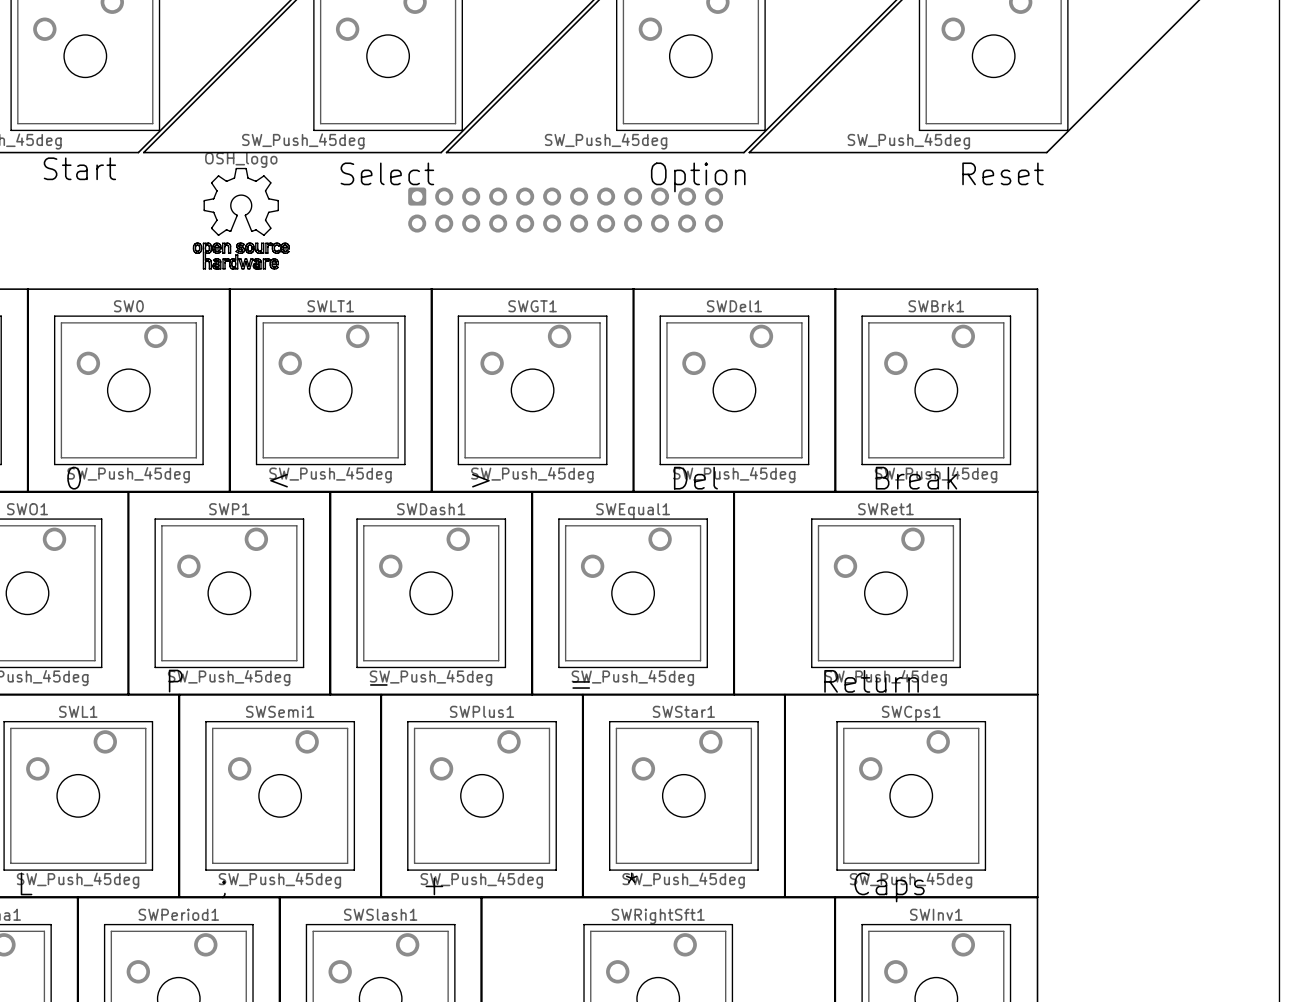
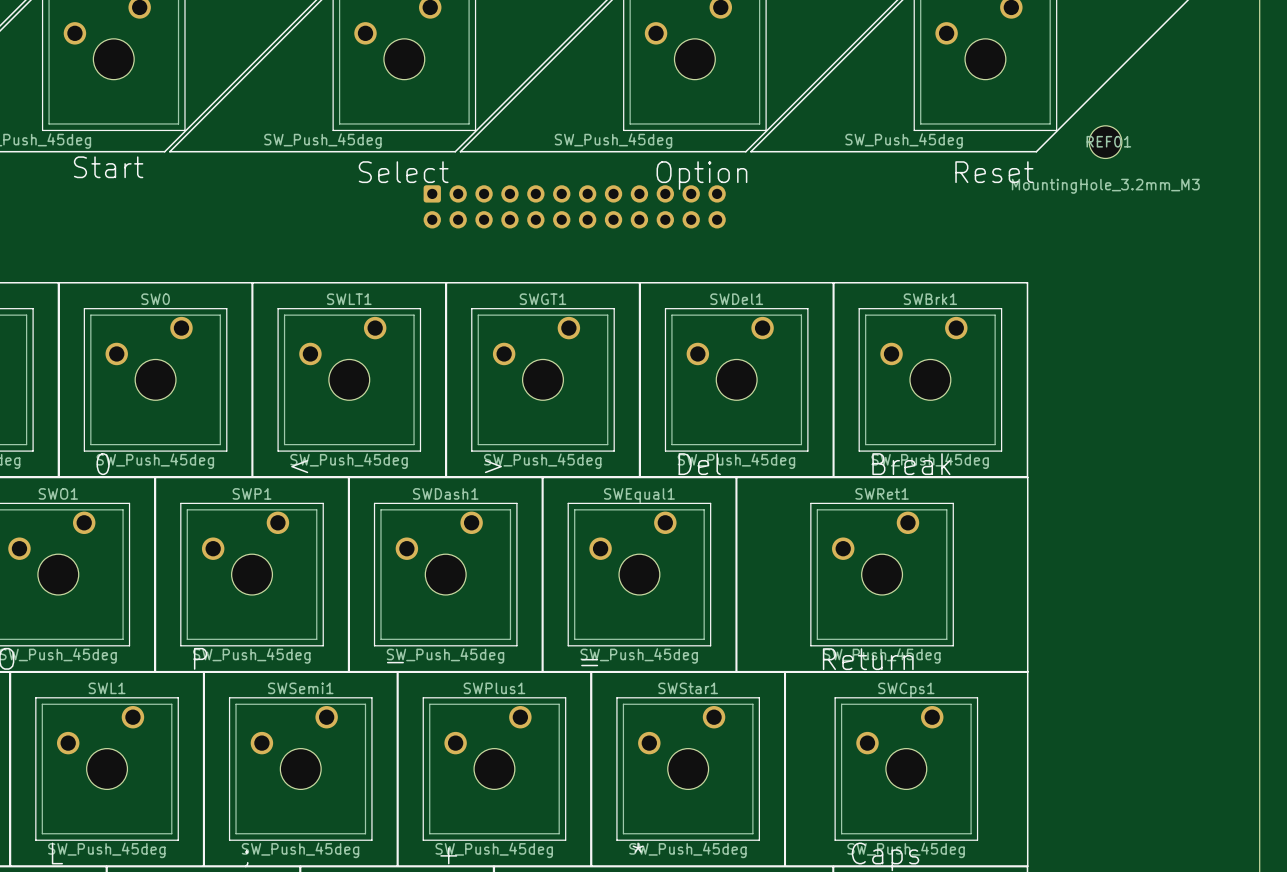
REF01: none -> MountingHole_3.2mm_M3 (1105, 142)
drawing: [192, 168, 290, 270] -> none

